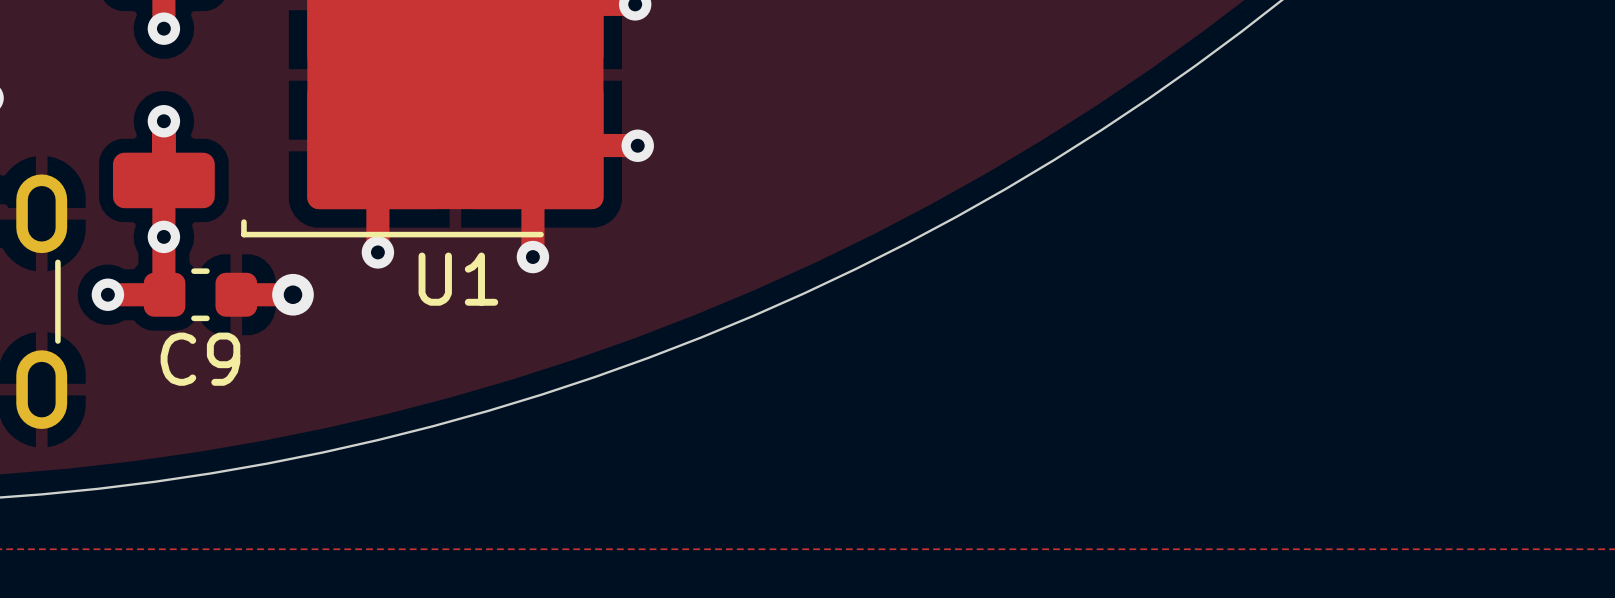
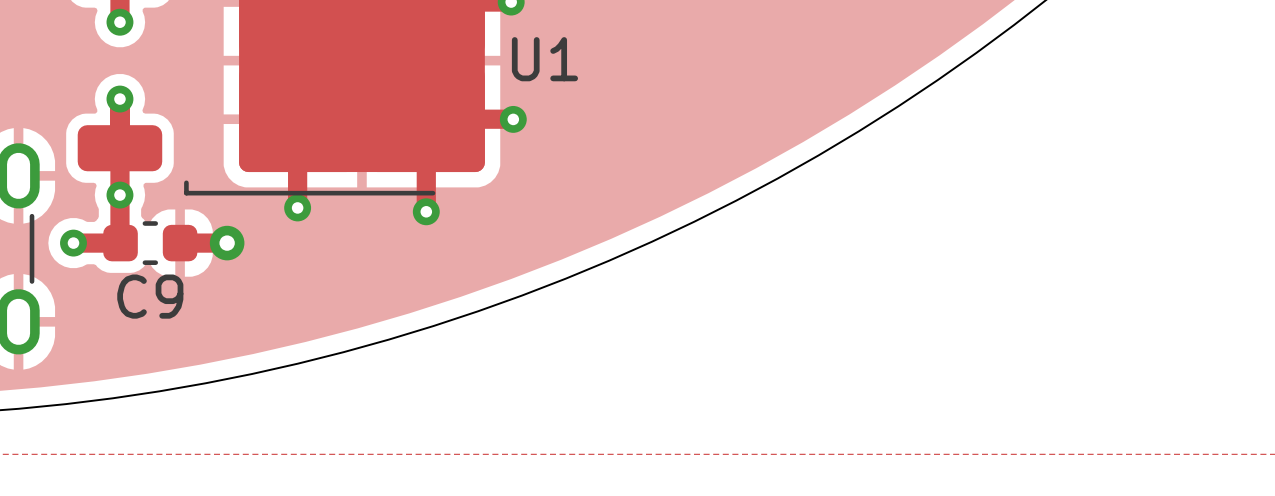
U1 name position: U1 (458, 279) -> U1 (544, 59)

